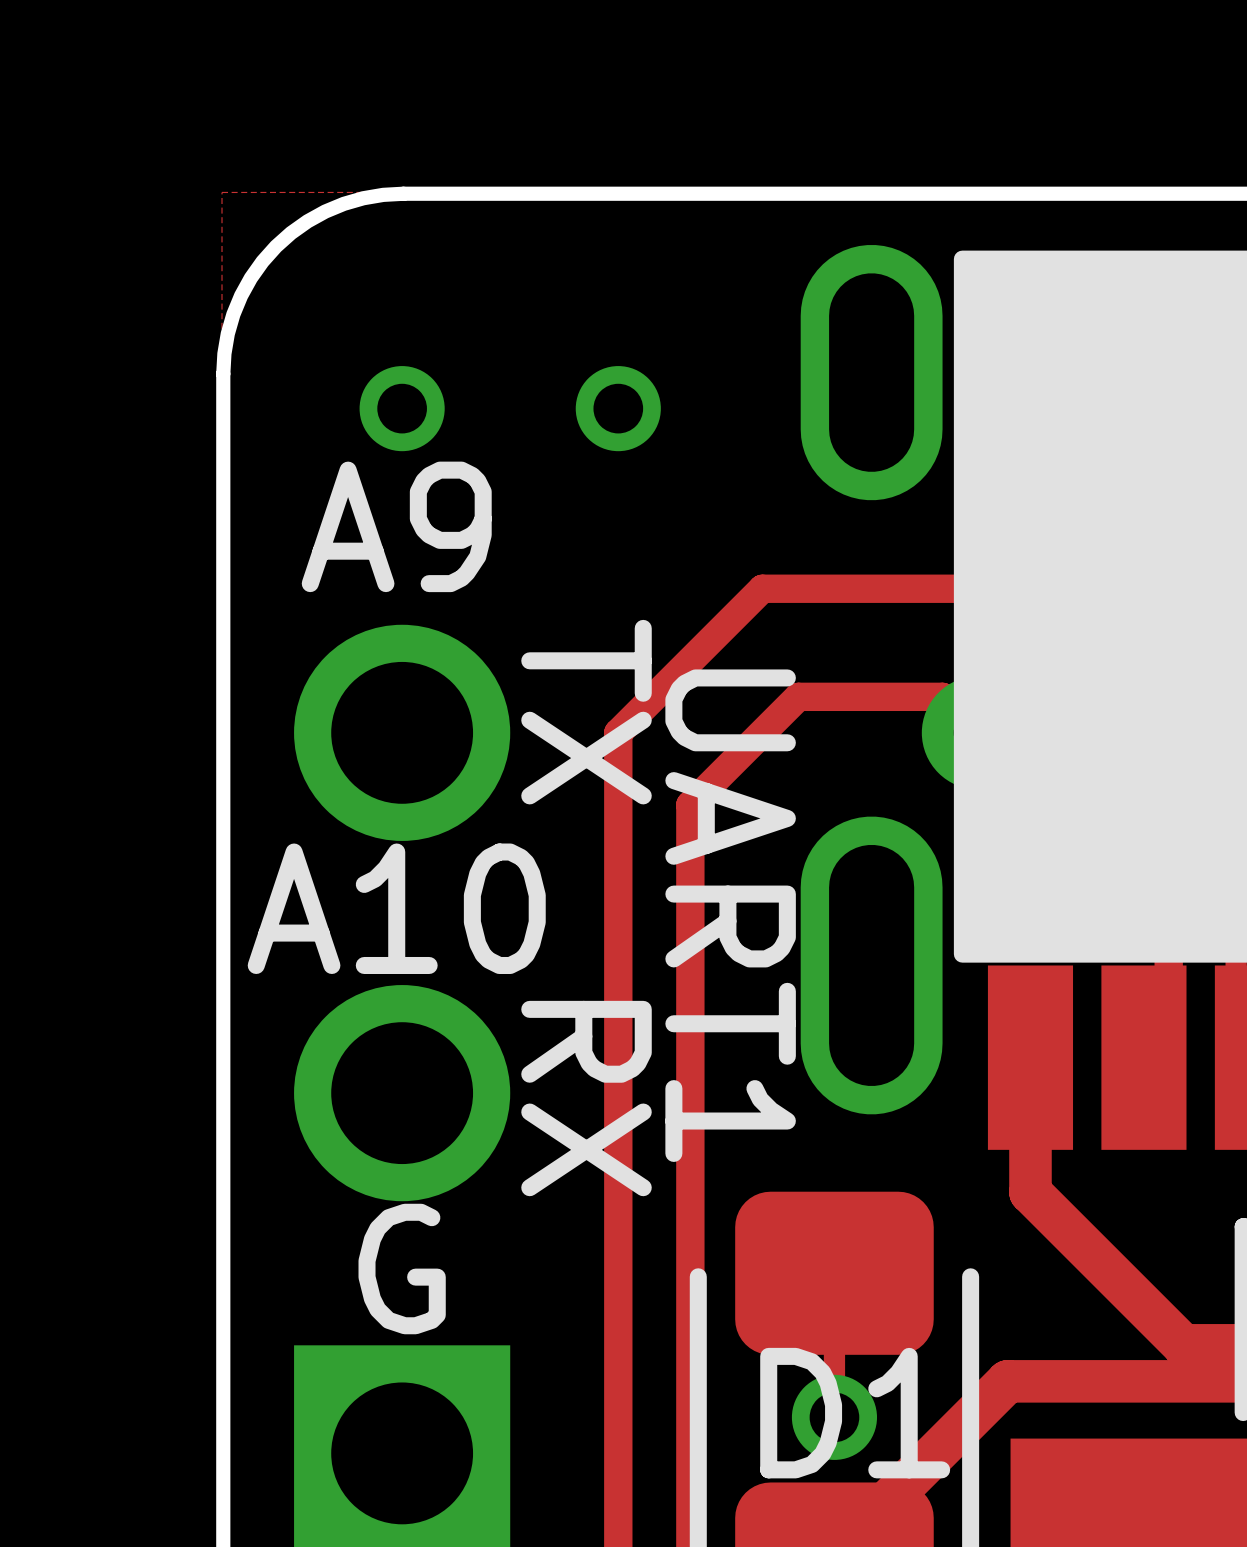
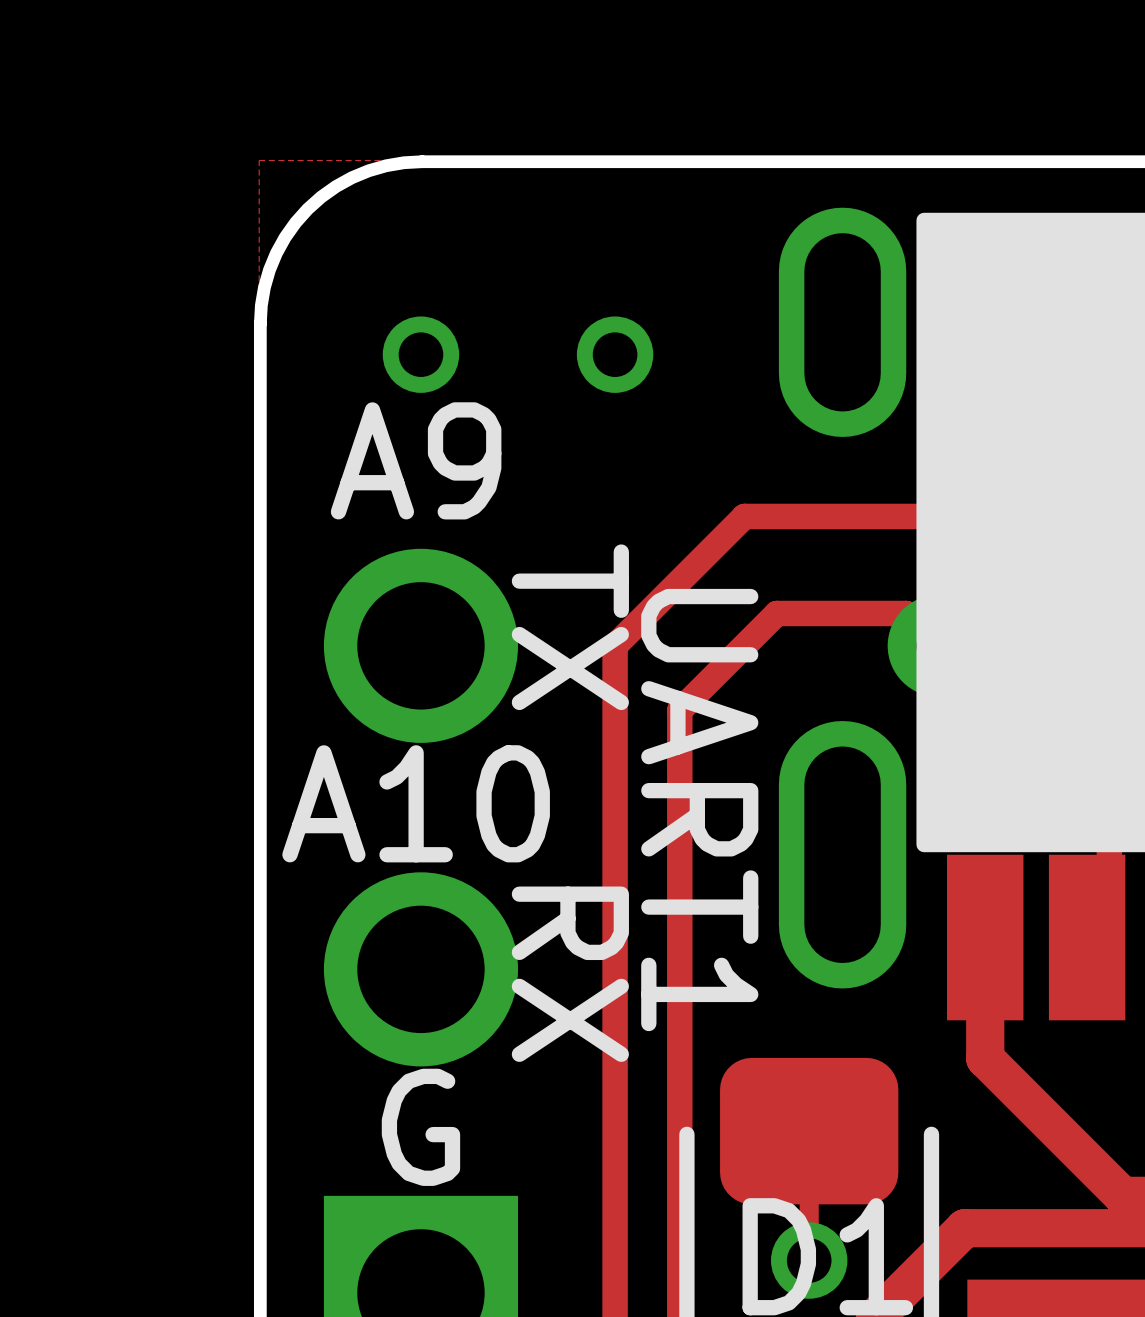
text position: TX (586, 712) -> TX (570, 627)
text position: UART1 (730, 915) -> UART1 (699, 810)
text position: RX (586, 1098) -> RX (570, 974)

